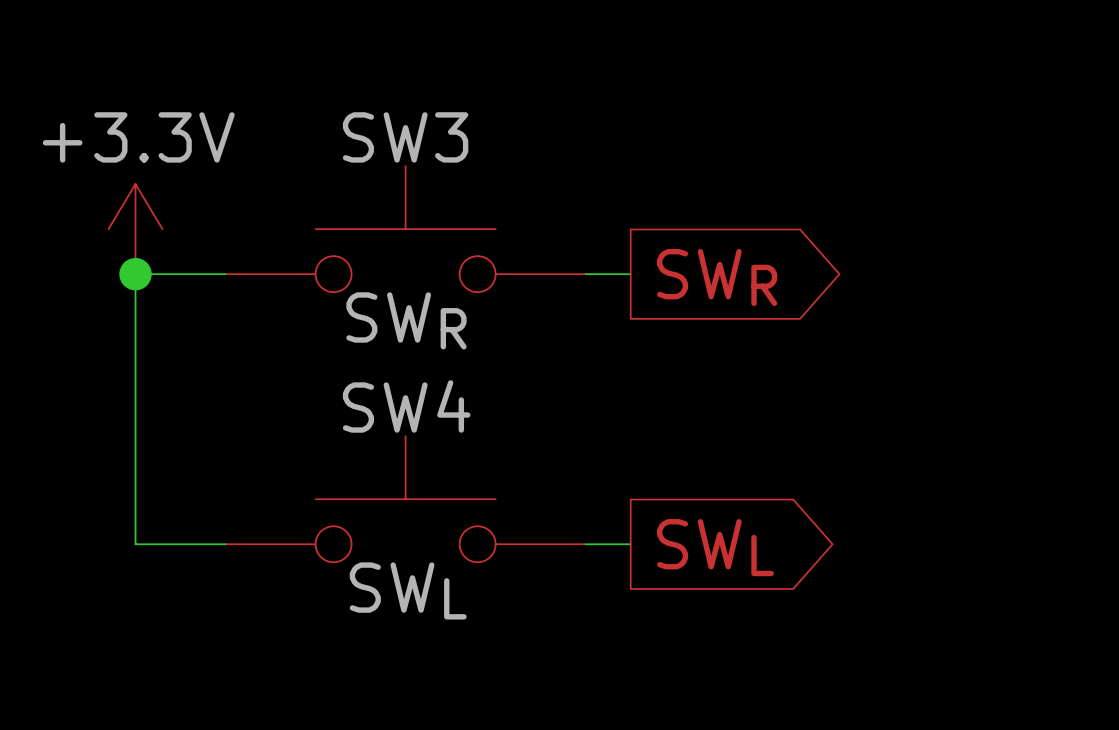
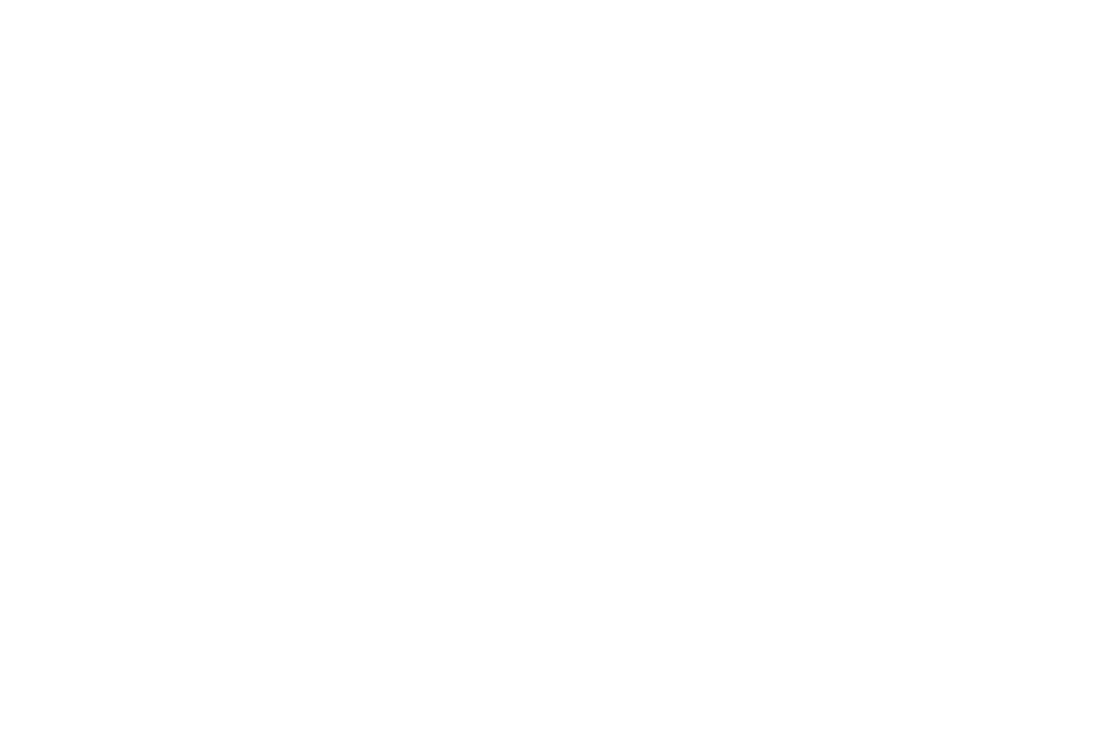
power symbol: +3.3V (135, 229) -> none
SW3: SWR (405, 229) -> none
junction: (135, 274) -> none
wire: (225, 274) (135, 274) (135, 544) (225, 544) -> none
wire: (585, 274) (630, 274) -> none
global label: SWR (717, 277) -> none
SW4: SWL (405, 499) -> none
wire: (585, 544) (630, 544) -> none
global label: SWL (715, 547) -> none

